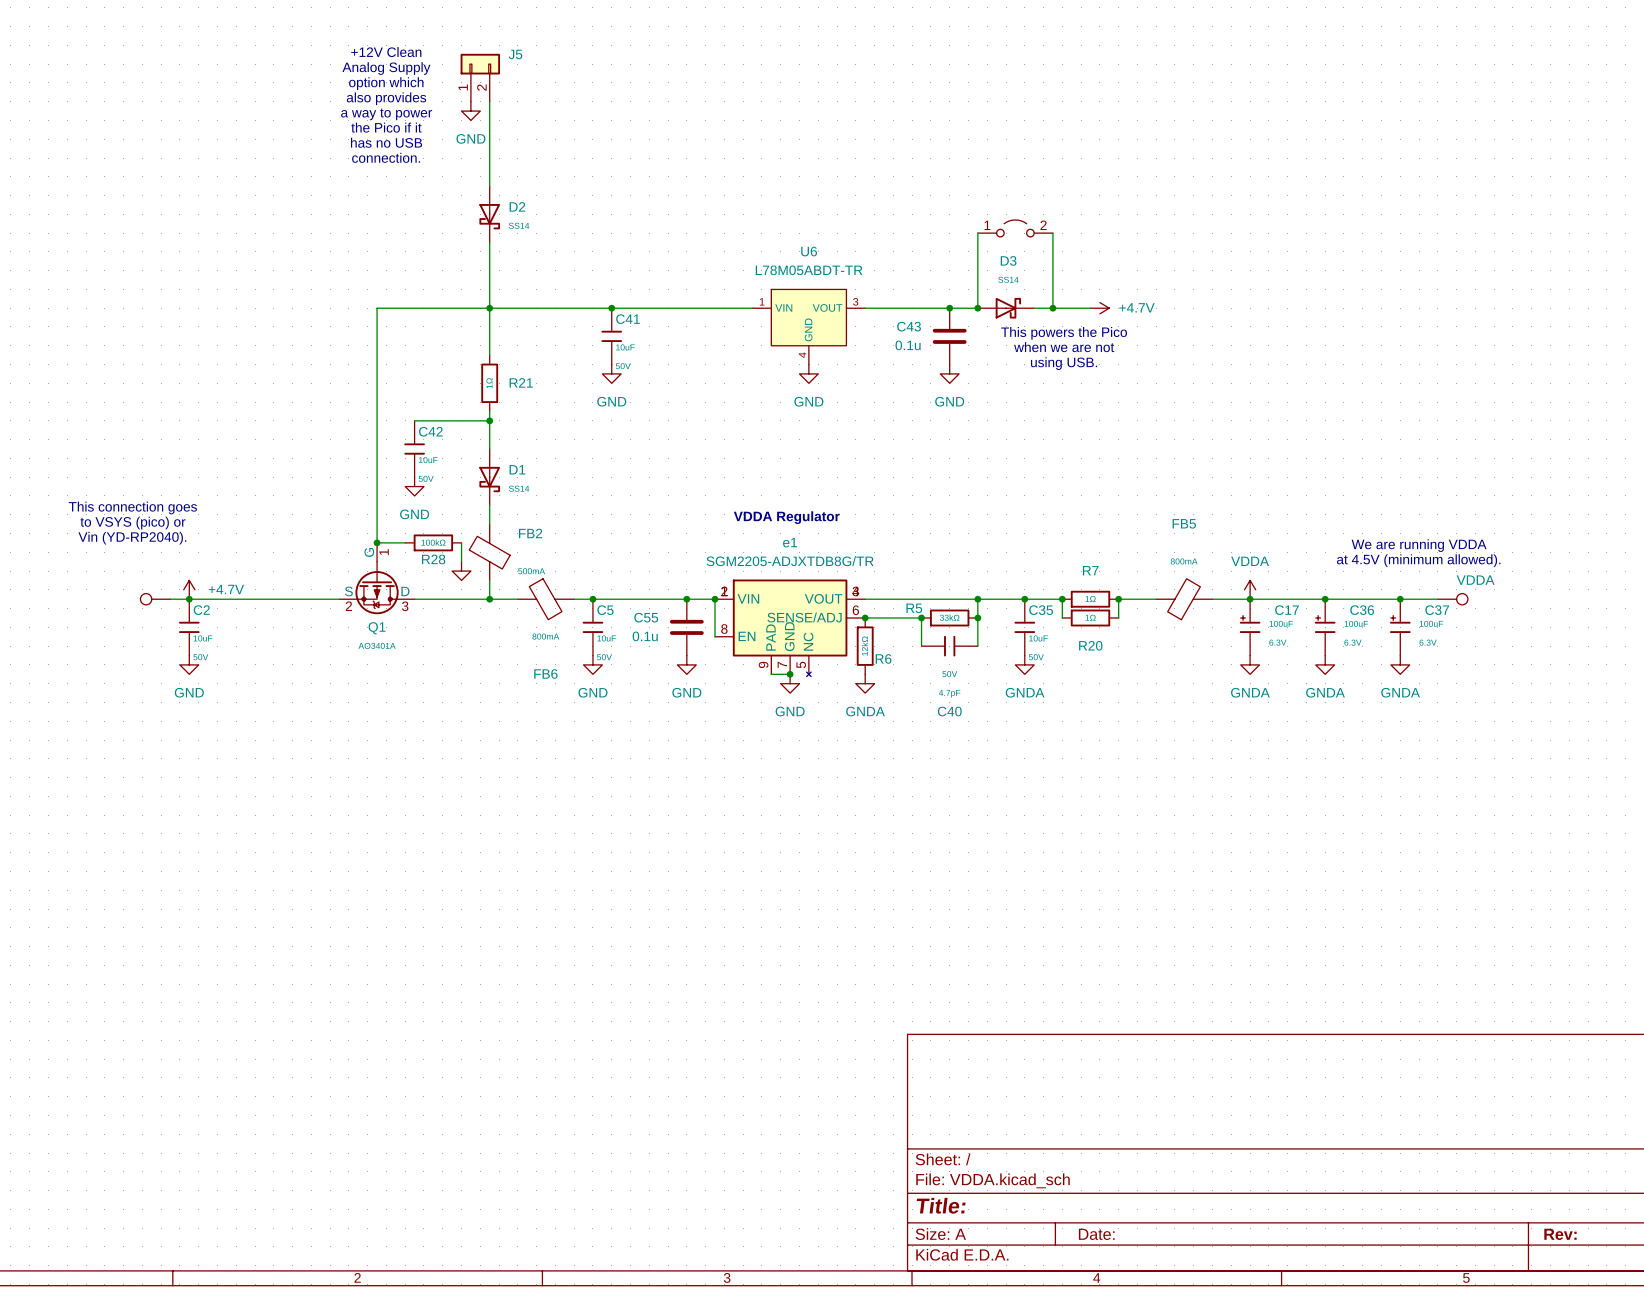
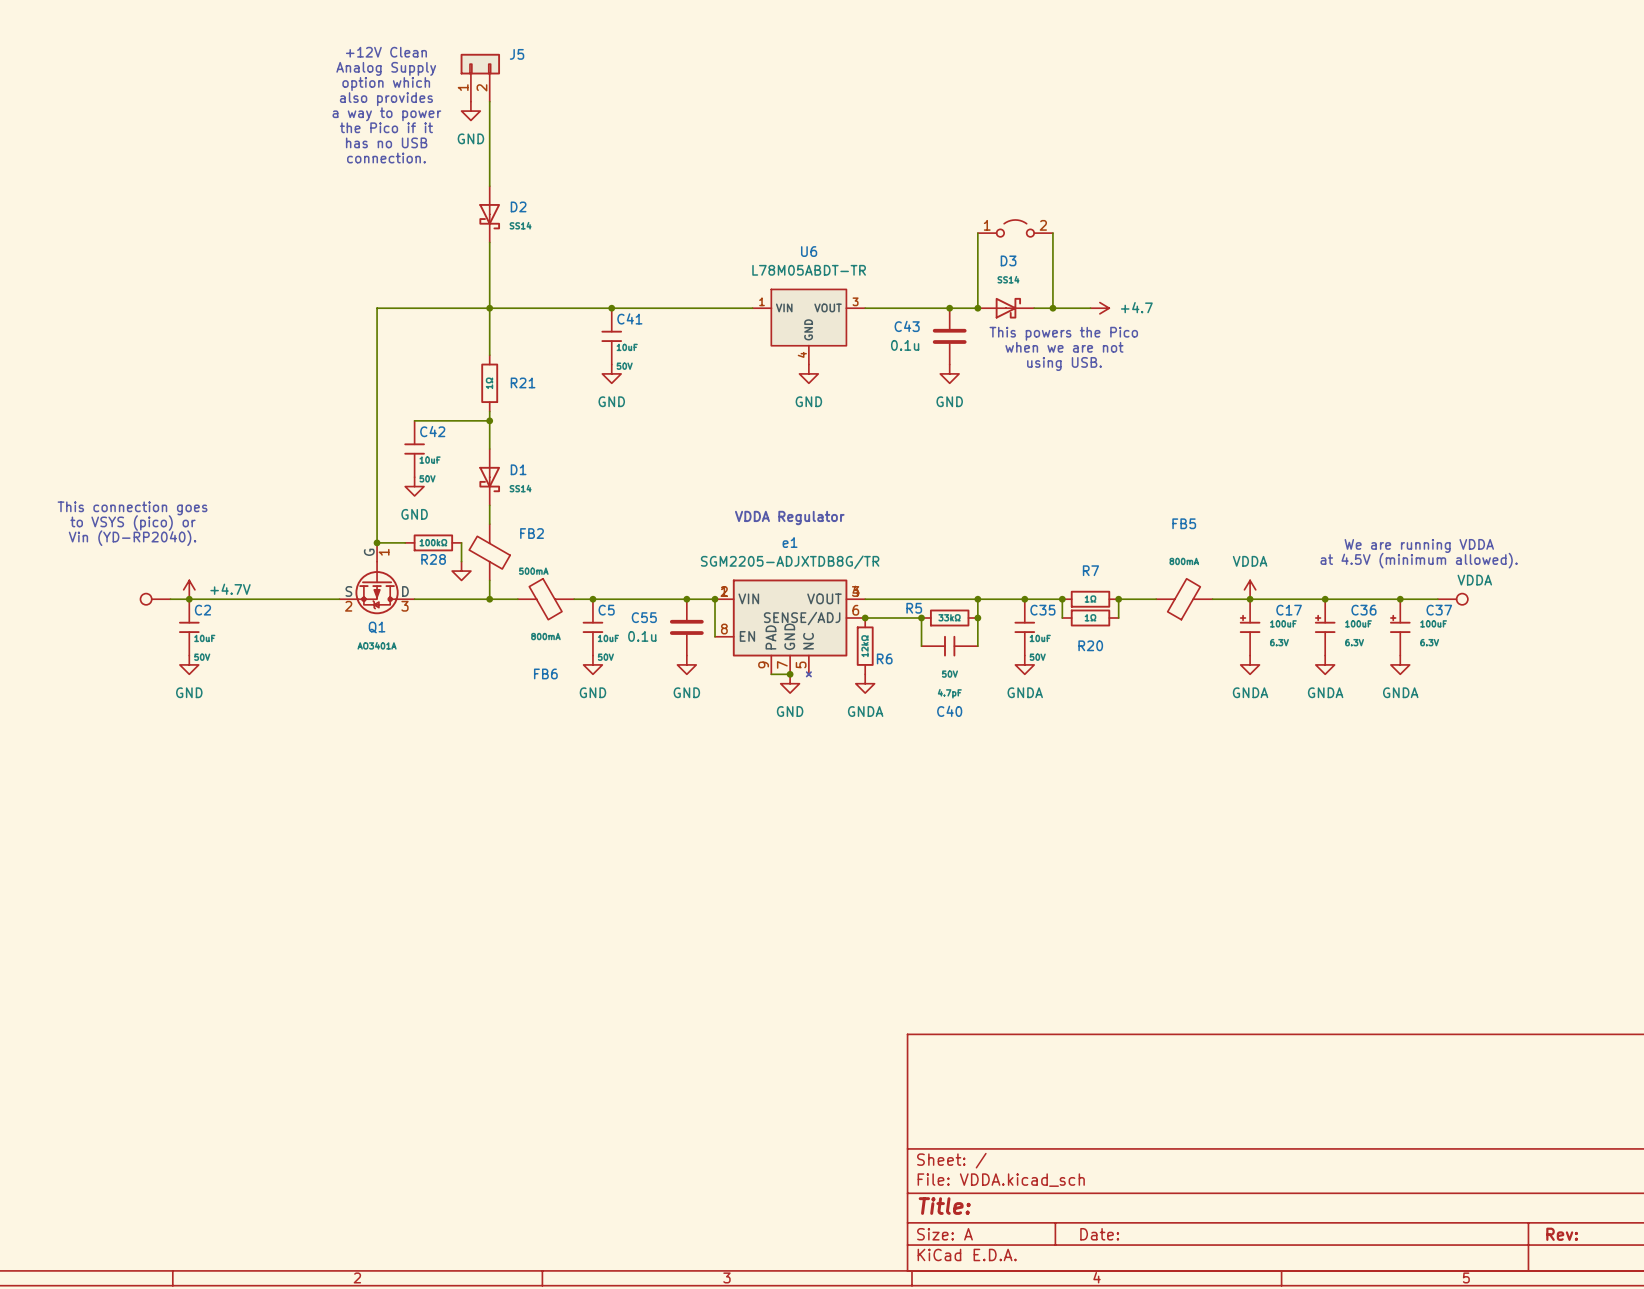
power symbol: +4.7V (1099, 308) -> +4.7 (1099, 308)

